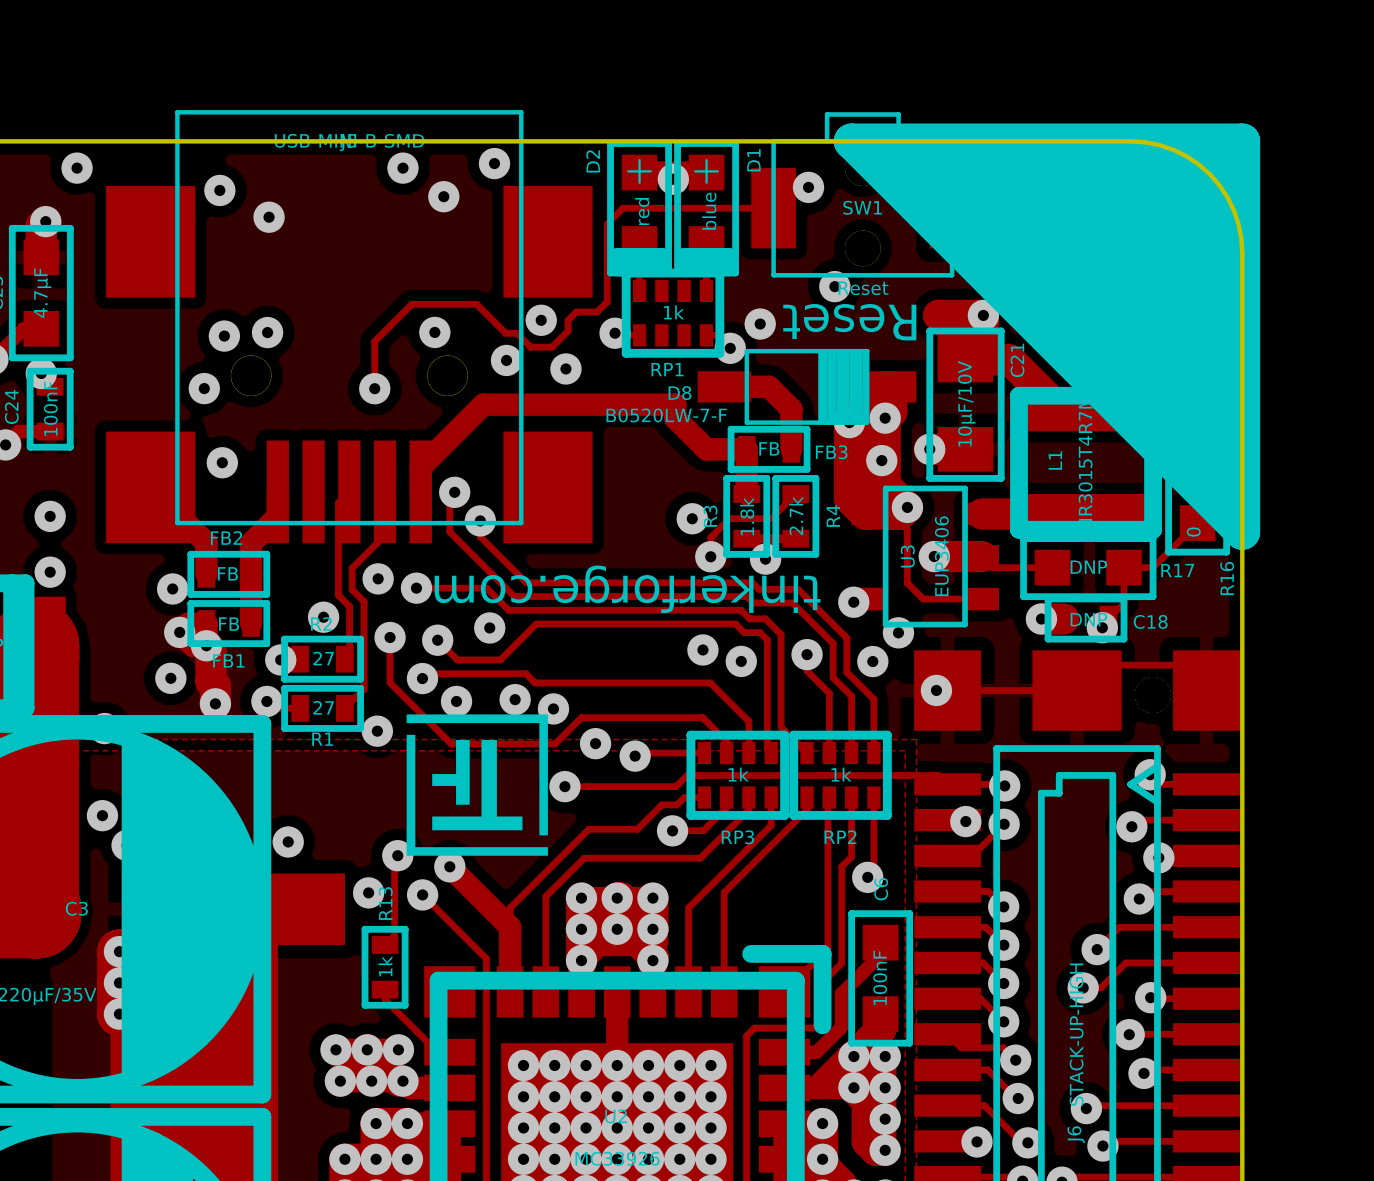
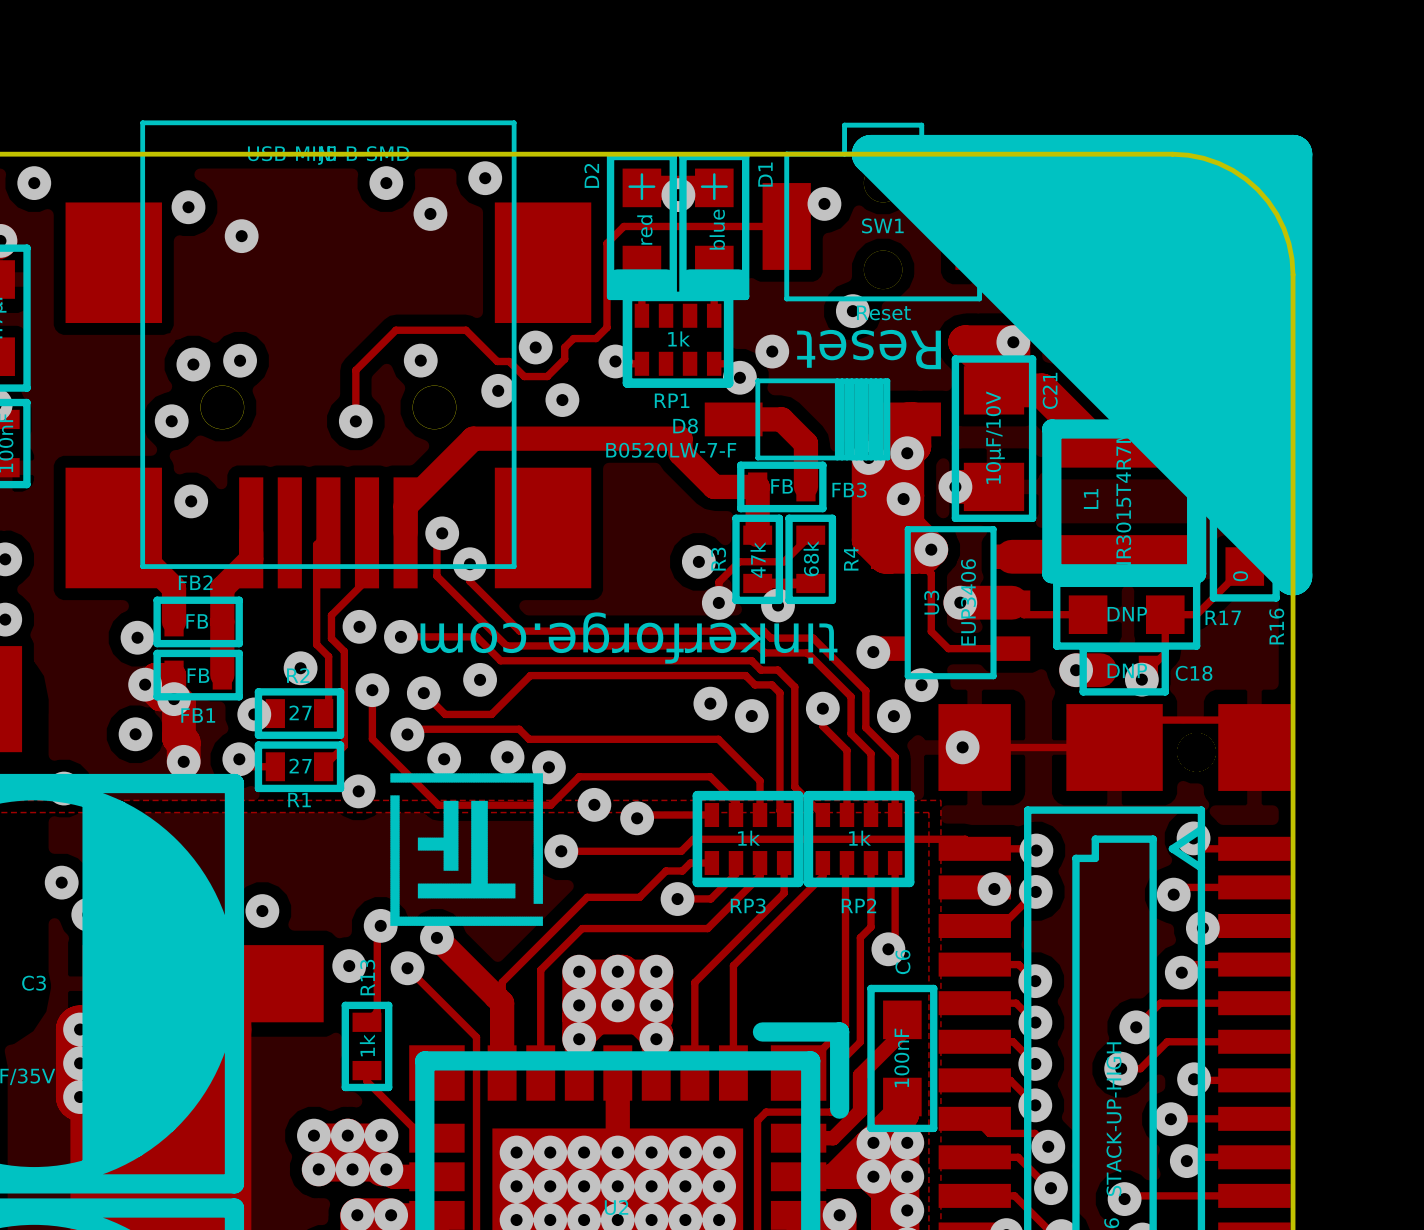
R4 value: 2.7k (796, 515) -> 68k (811, 558)
R3 value: 1.8k (747, 516) -> 47k (758, 559)

